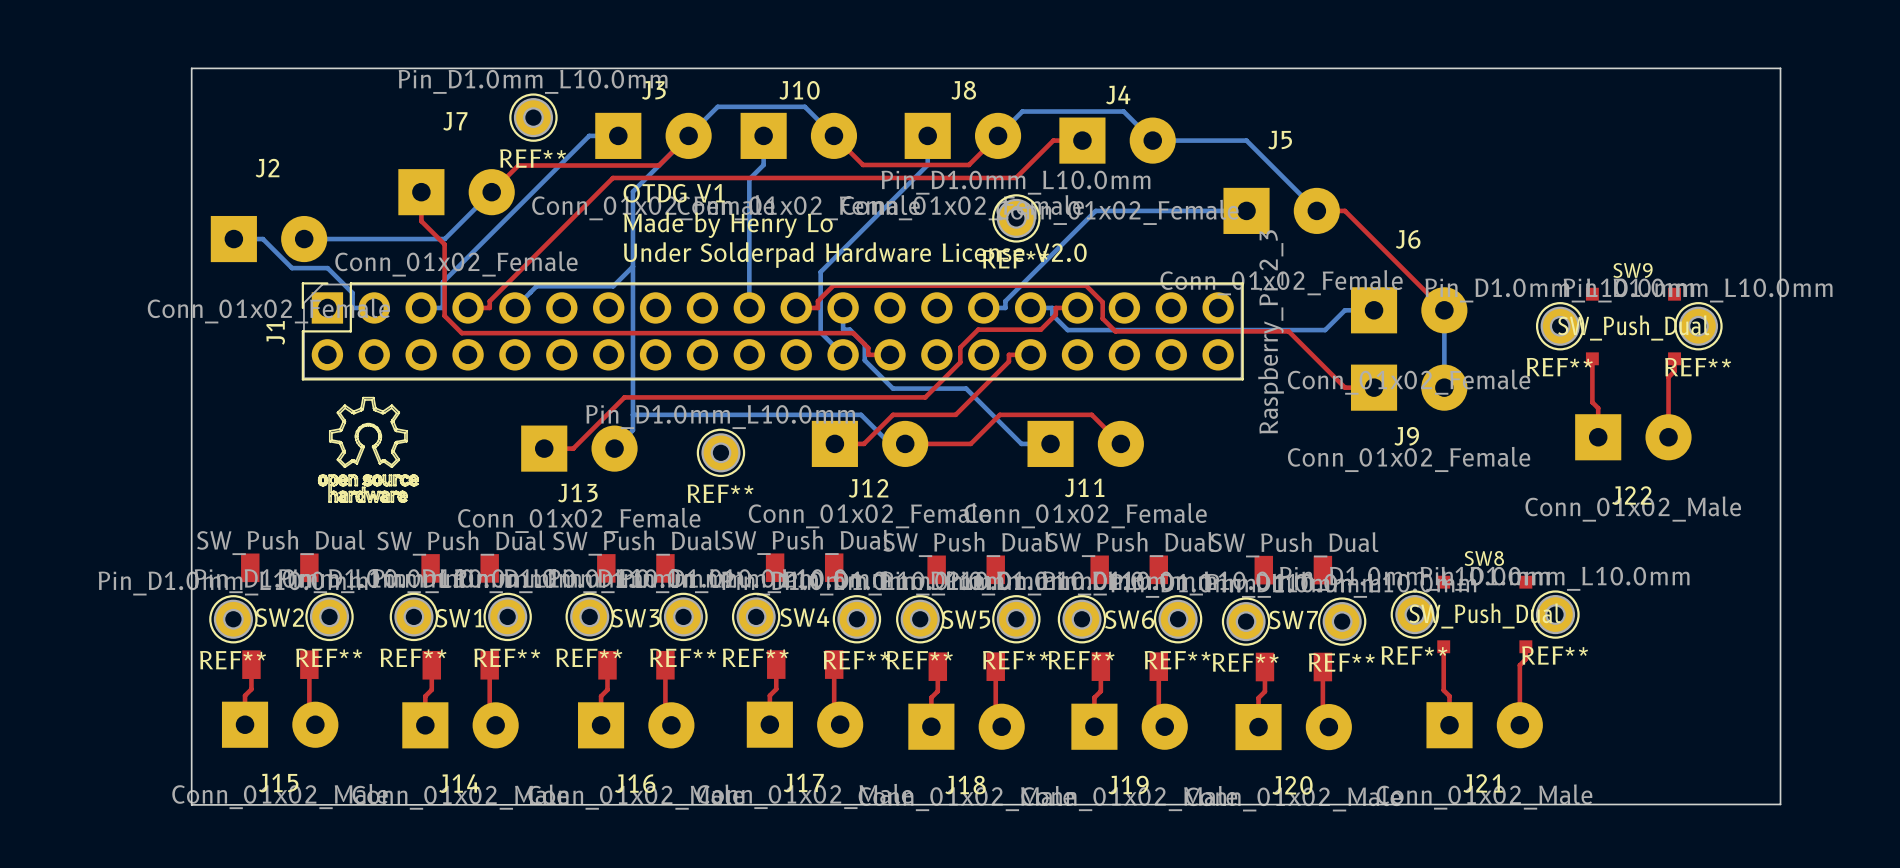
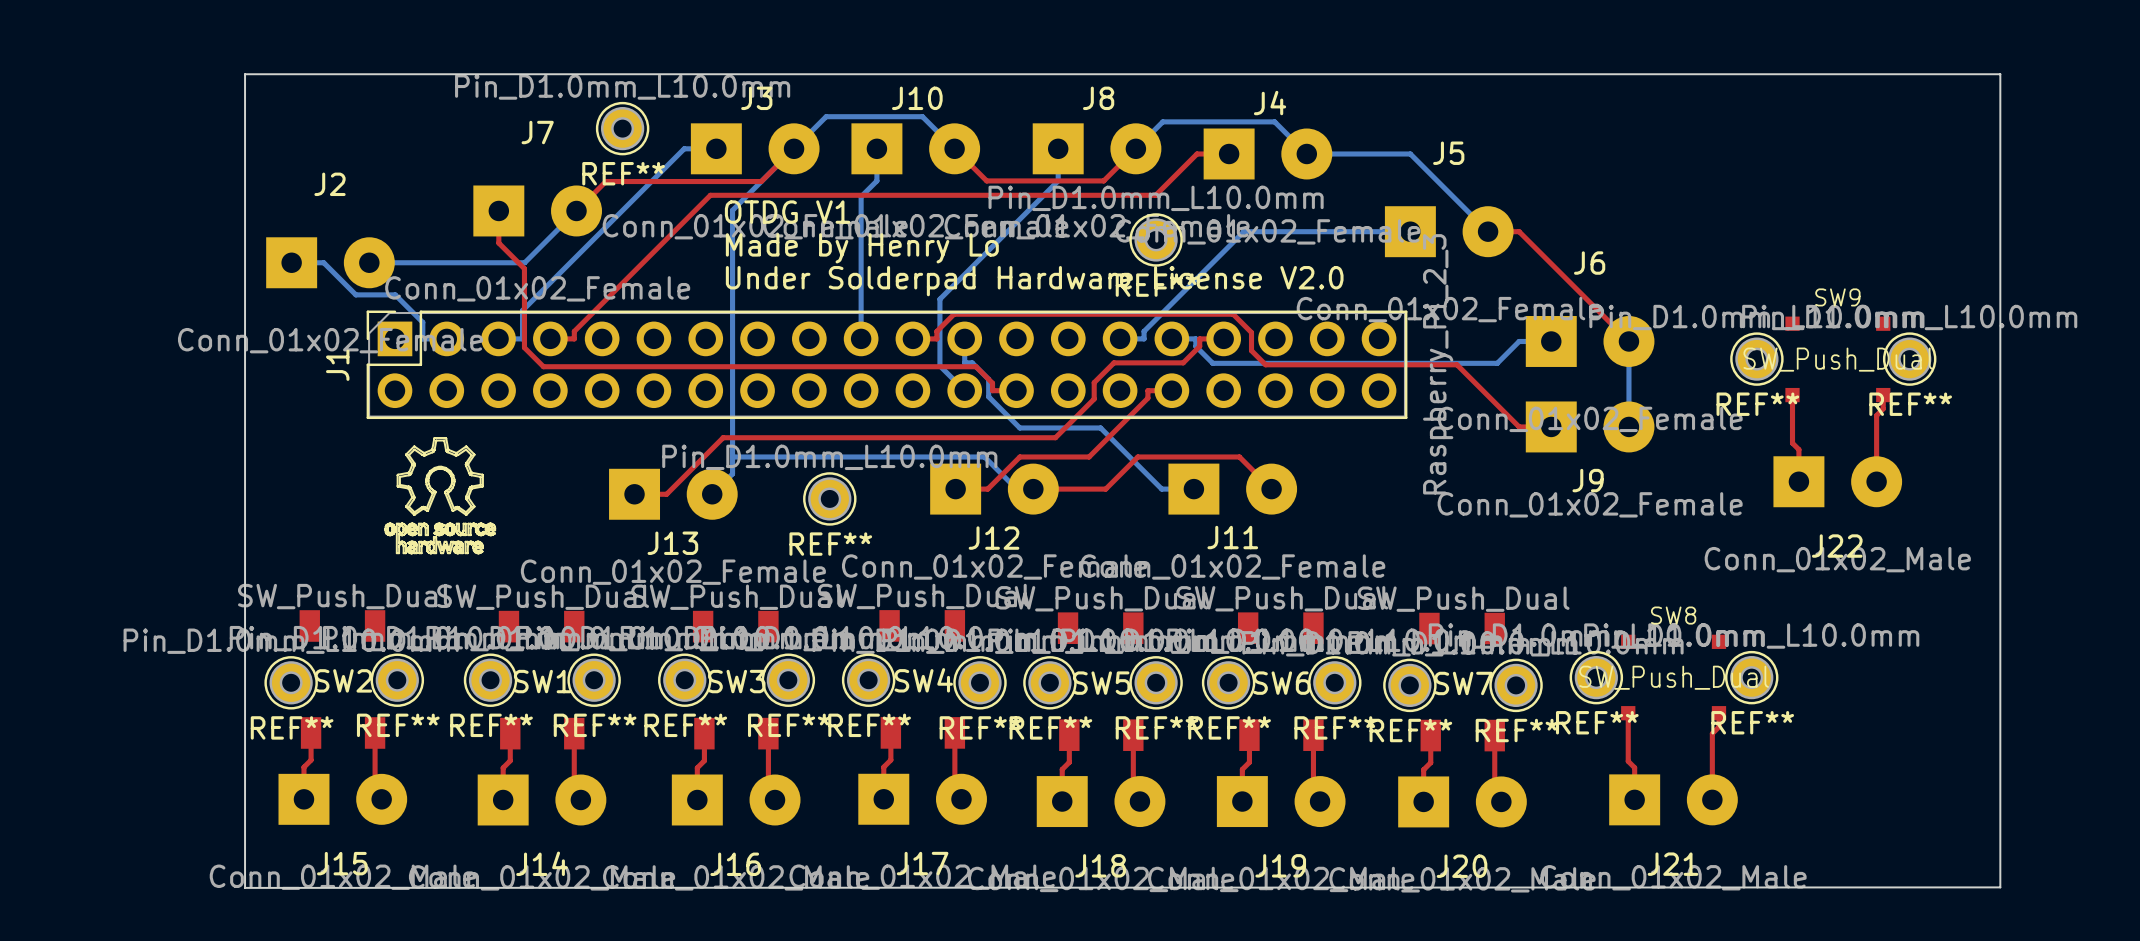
bottom track: (632, 266) (613, 286) (536, 286) (514, 307) -> none

